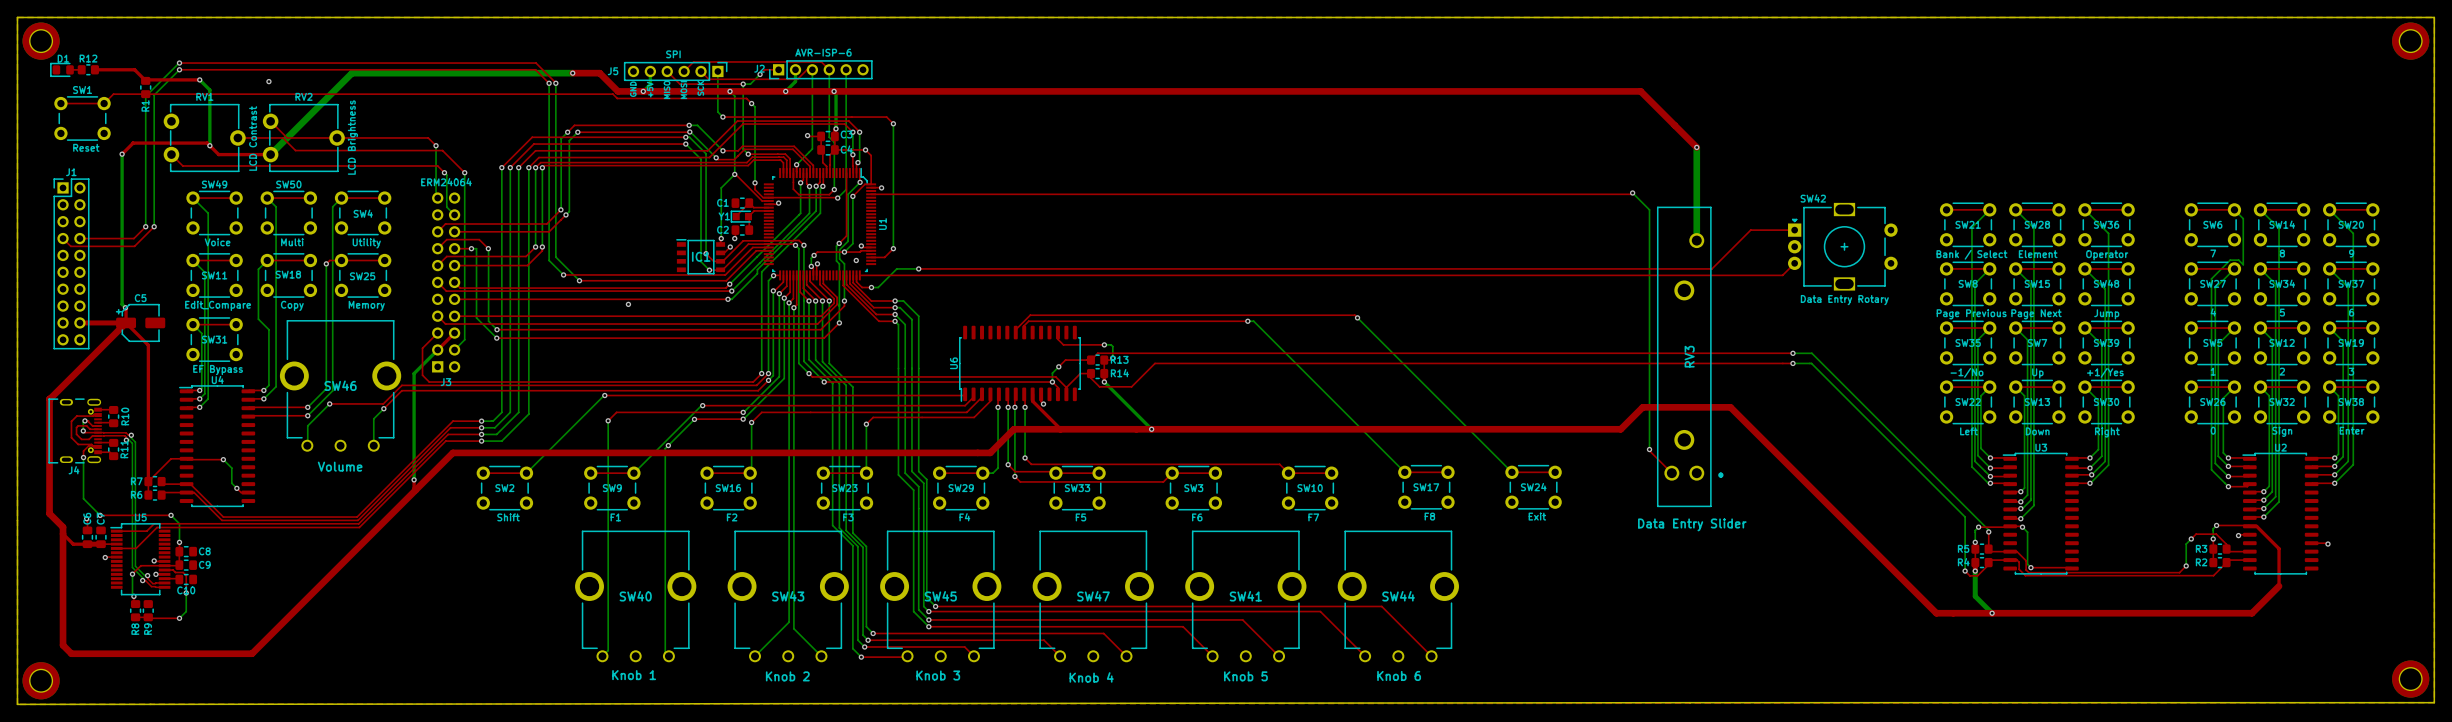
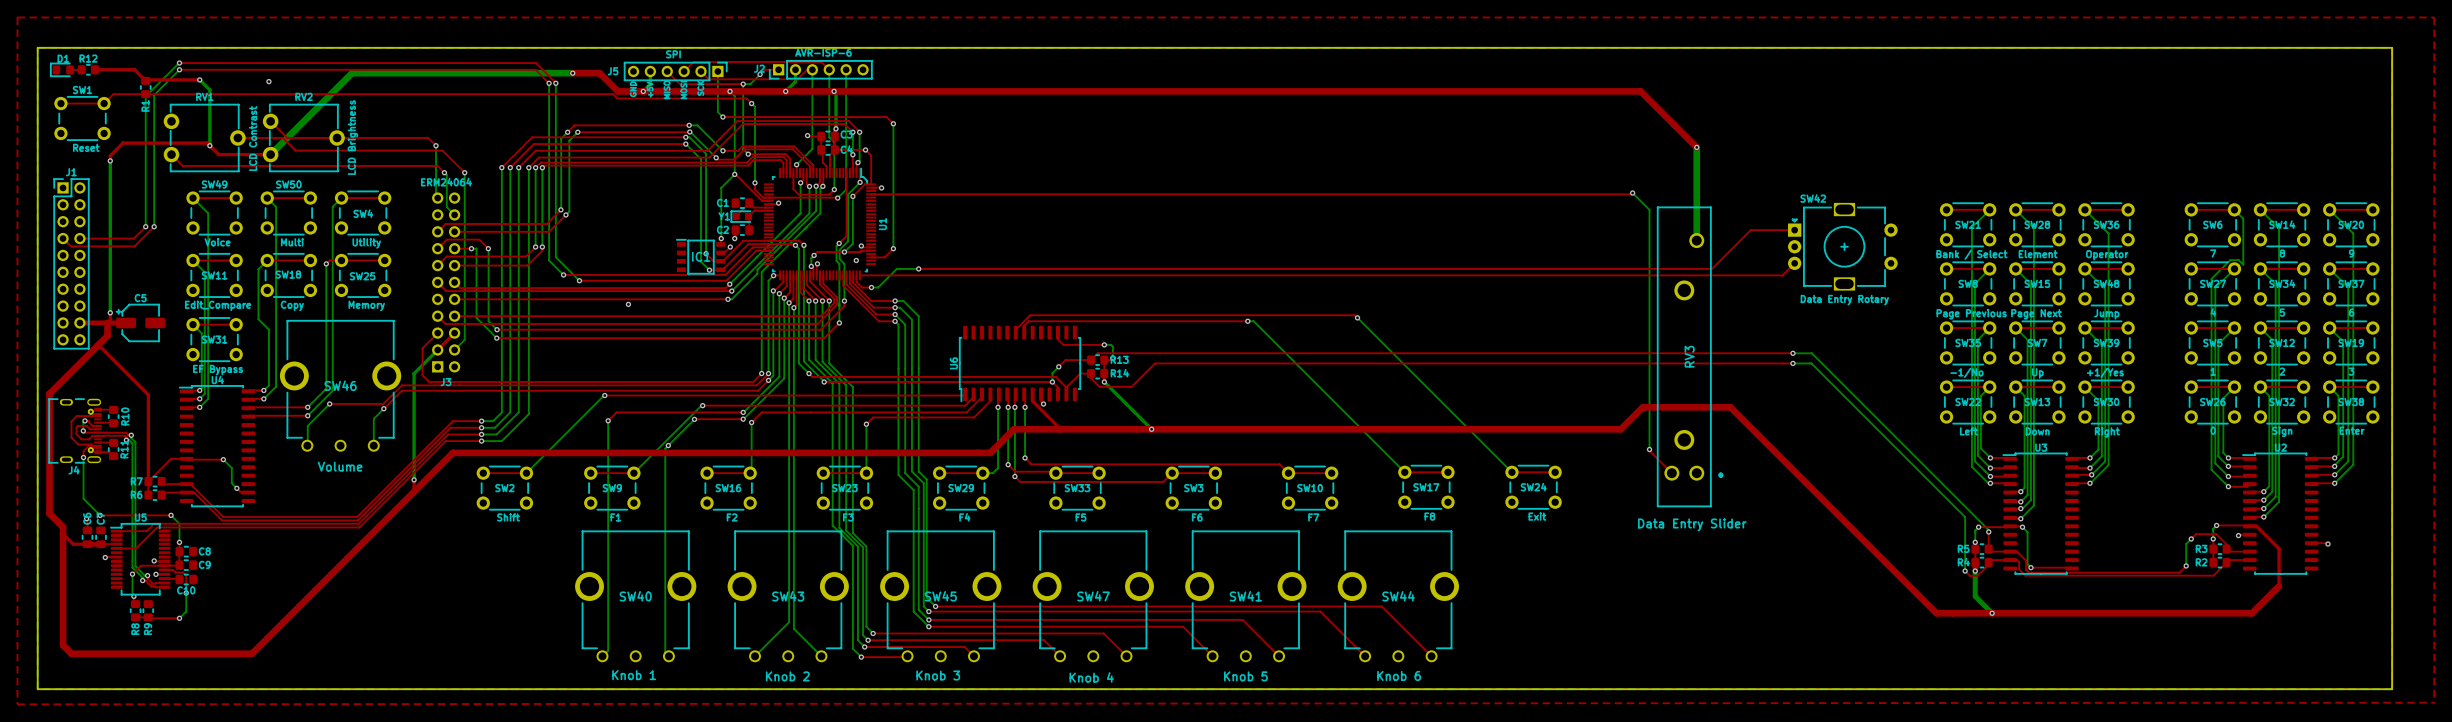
board edge: (17, 17) (17, 704) (2434, 702) (2434, 17) (17, 17) -> (37, 47) (37, 689) (2392, 689) (2392, 47) (37, 47)
part: (41, 41) -> none
part: (2410, 41) -> none
top track: (132, 143) (122, 154) -> (132, 143) (123, 143) (110, 155) (110, 160)
bottom track: (122, 154) (122, 304) (125, 307) -> none
via position: (122, 154) -> (110, 160)
bottom track: none -> (110, 160) (110, 312)
top track: (125, 307) (126, 322) -> none
via position: (125, 307) -> (110, 312)
top track: (126, 322) (49, 398) -> (110, 312) (110, 320) (107, 322) (107, 335) (49, 393) (49, 398)
top track: (126, 322) (148, 345) (148, 394) -> (98, 344) (148, 394)
part: (2410, 679) -> none
part: (41, 680) -> none

